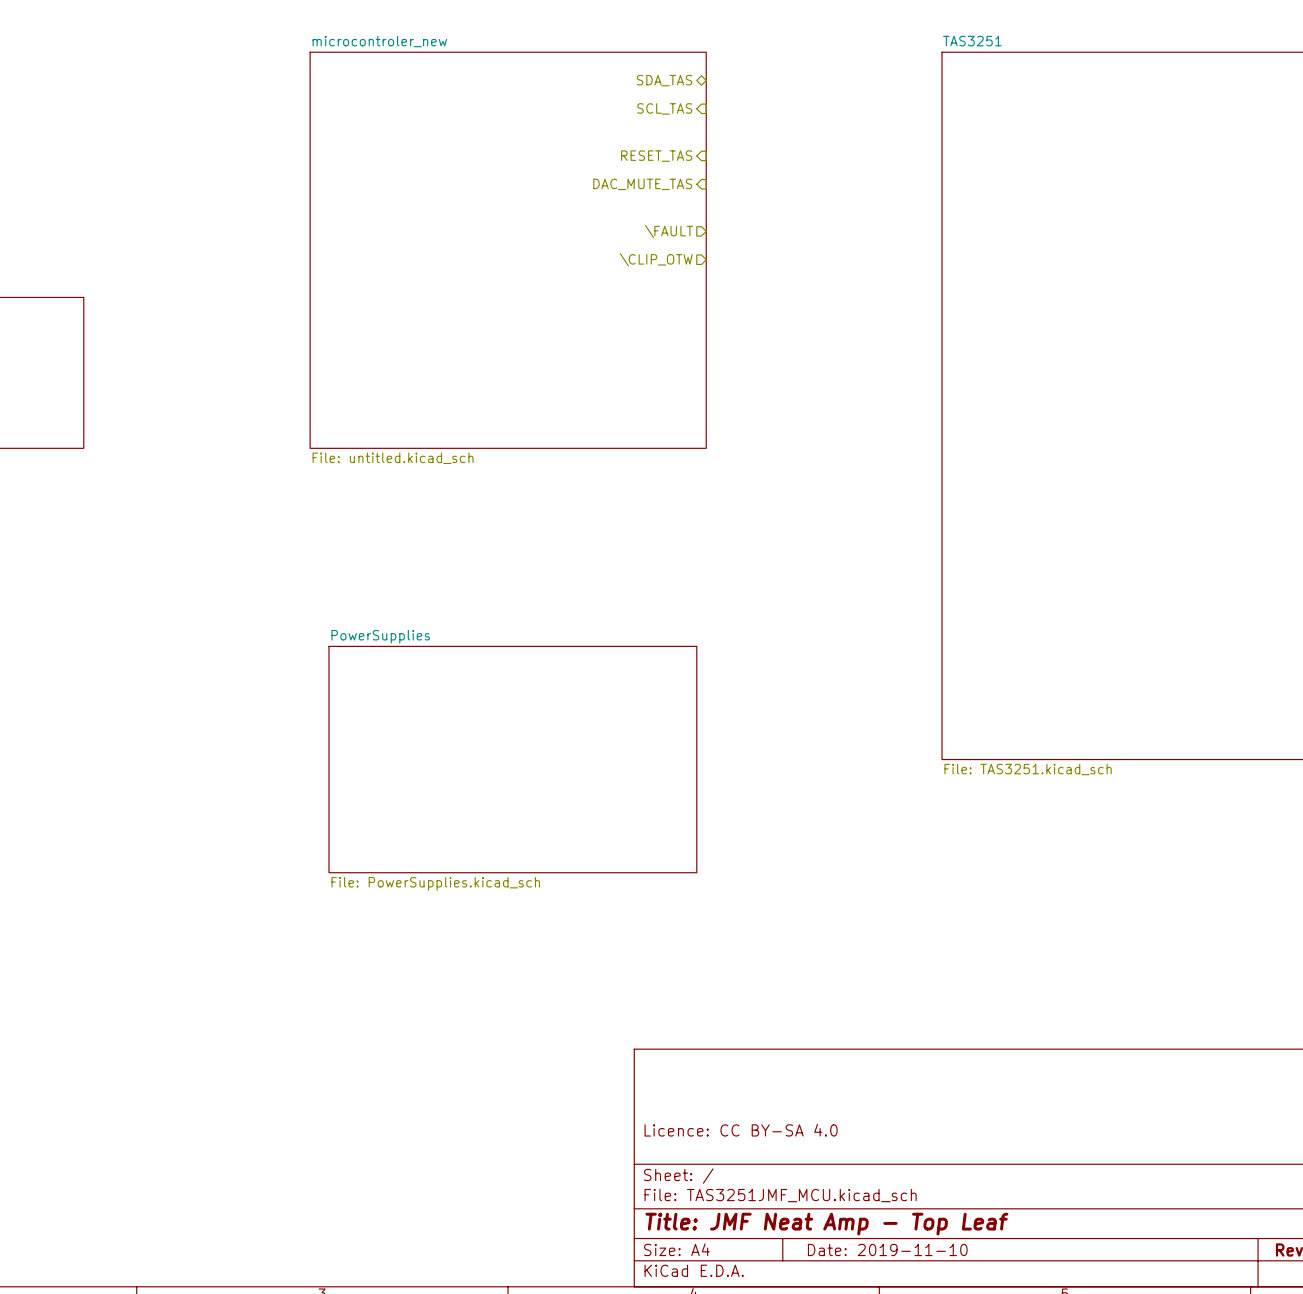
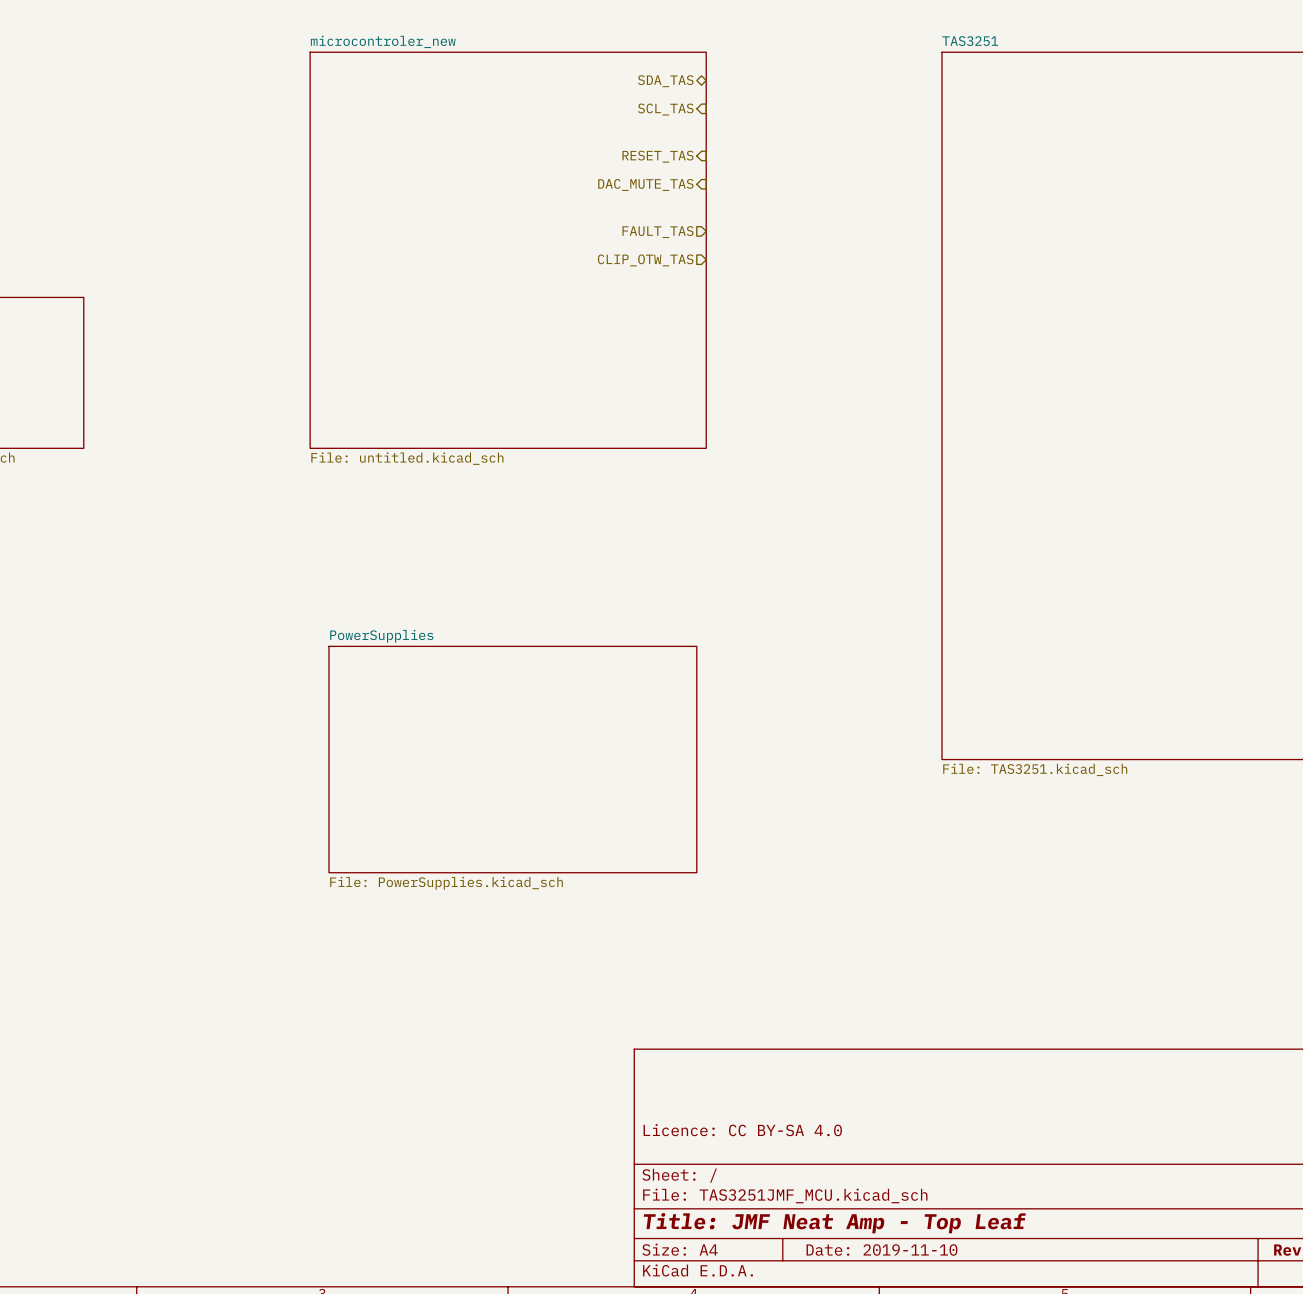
hierarchical label: \FAULT (669, 231) -> FAULT_TAS (657, 232)
hierarchical label: \CLIP_OTW (656, 259) -> CLIP_OTW_TAS (645, 260)

